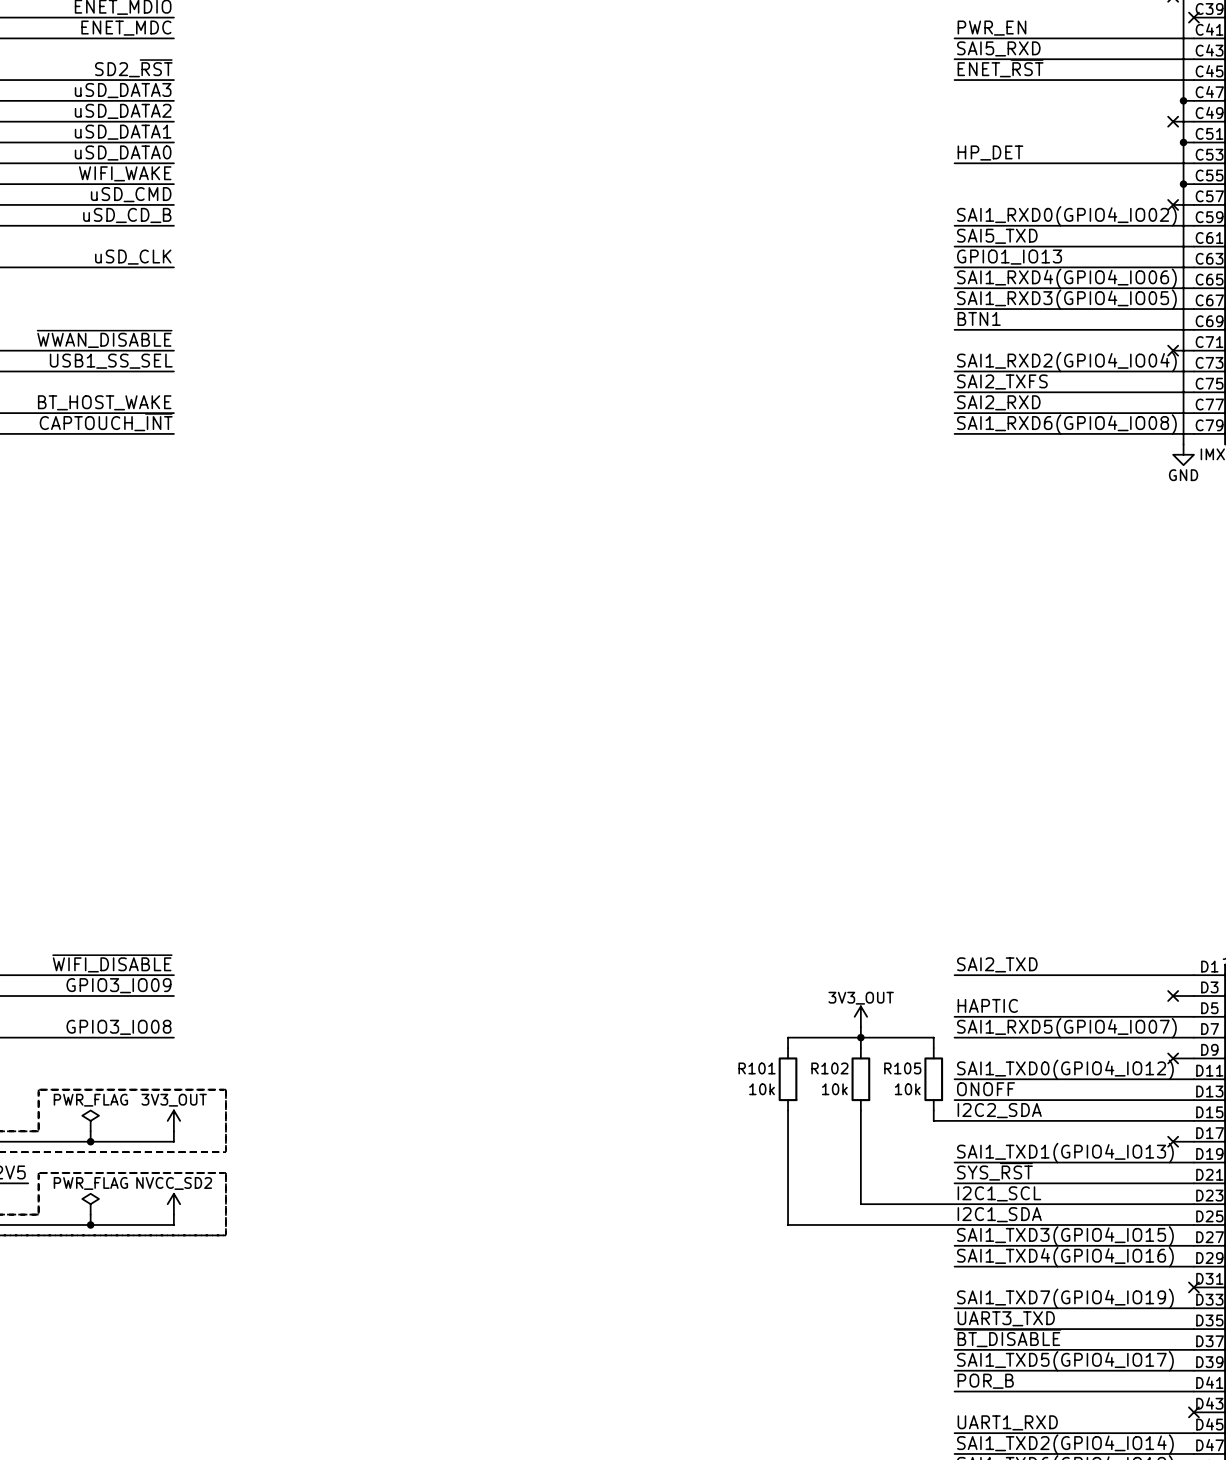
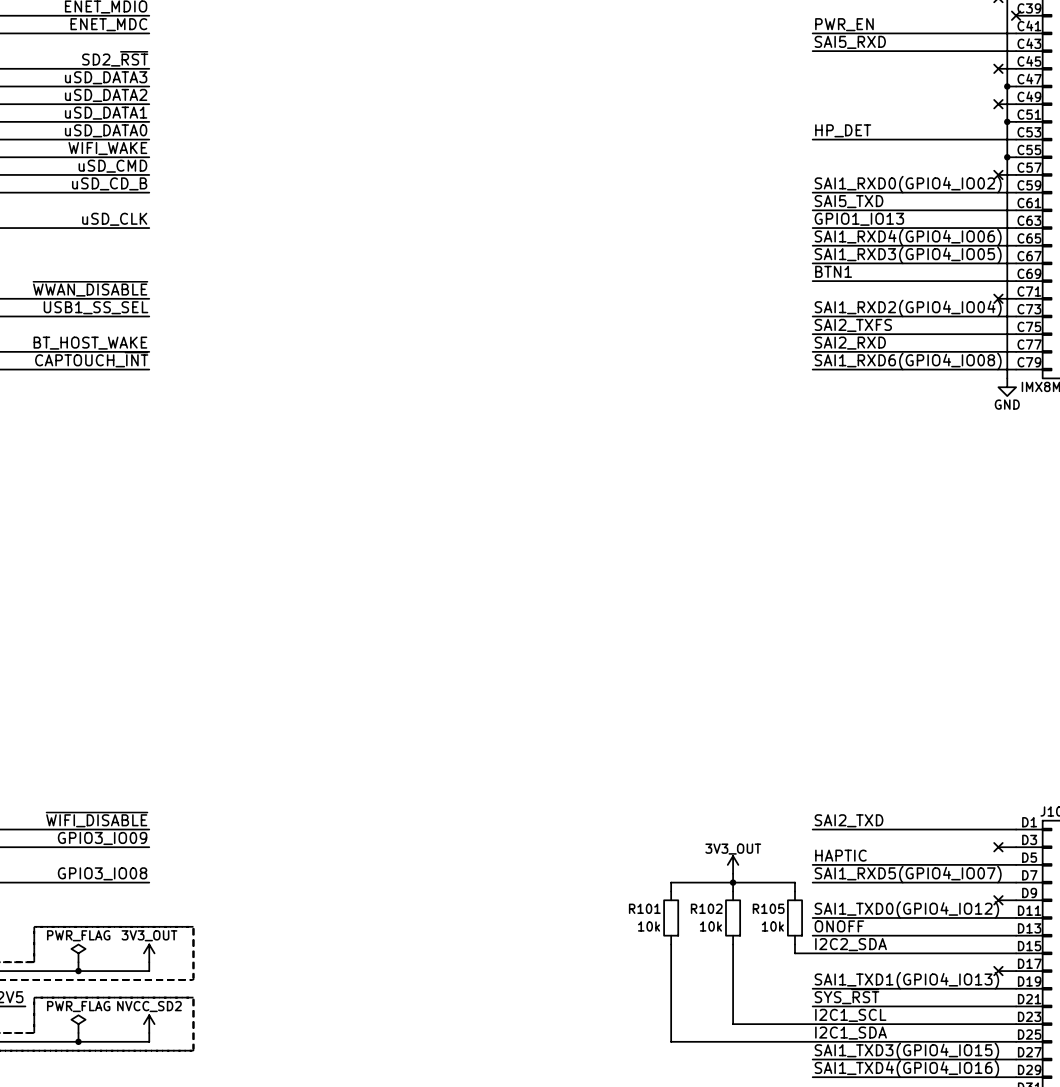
label: ENET_~{RST} (1000, 68) -> none
wire: (954, 80) (1173, 80) -> none
no-connect mark: none -> (998, 68)

